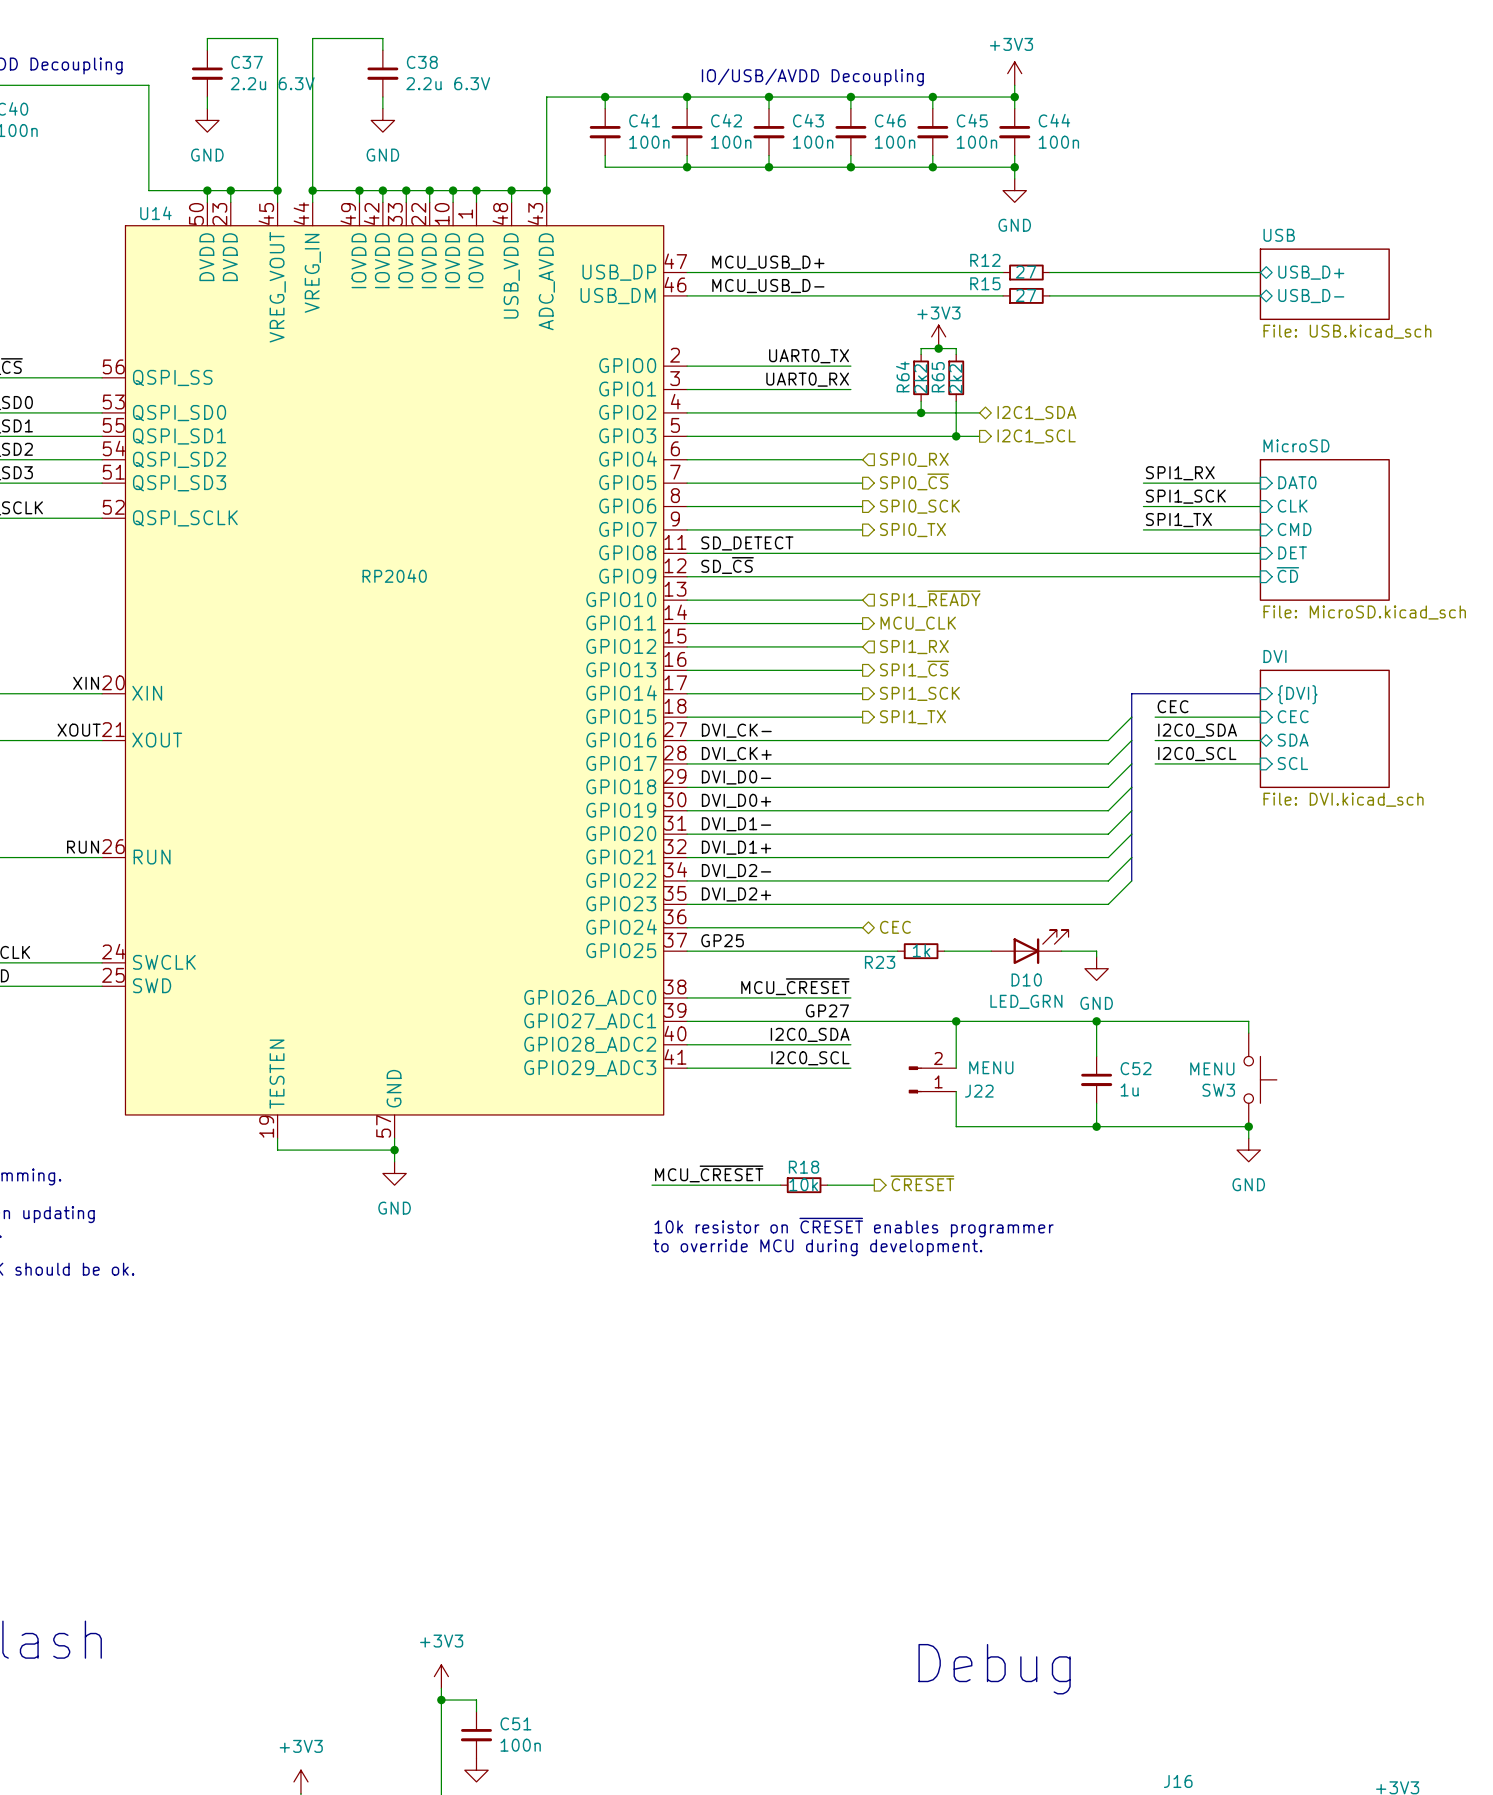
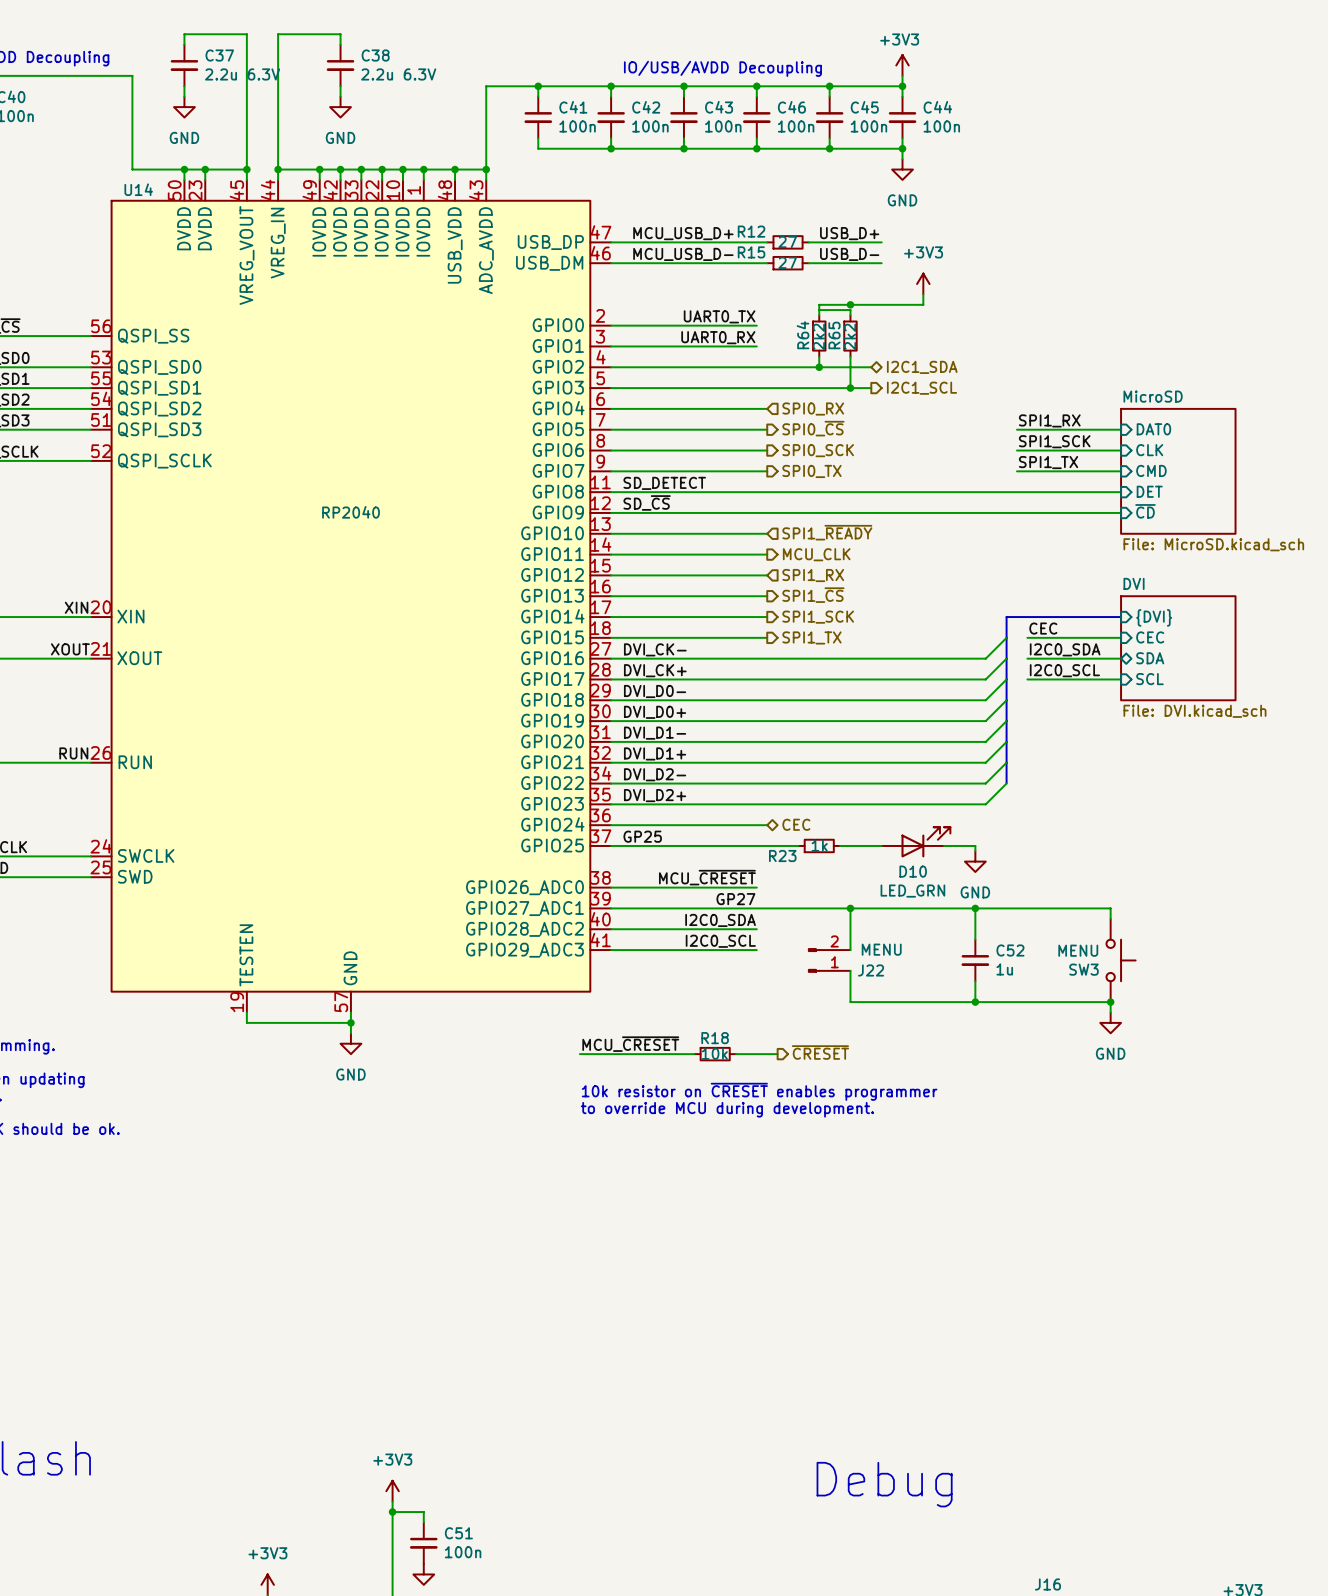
label: none -> USB_D+ (849, 233)
wire: (862, 272) (909, 272) -> none
wire: (991, 272) (1003, 272) -> none
R12 position: (1026, 272) -> (788, 242)
wire: (1049, 272) (1260, 272) -> none
sheet pin: USB_D+ (1311, 272) -> none
sheet USB: File: USB.kicad_sch (1324, 284) -> none
label: none -> USB_D- (849, 254)
wire: (862, 295) (909, 295) -> none
wire: (991, 295) (1003, 295) -> none
R15 position: (1026, 295) -> (788, 263)
wire: (1049, 295) (1260, 295) -> none
sheet pin: USB_D- (1311, 296) -> none
power symbol text position: +3V3 (938, 313) -> +3V3 (923, 252)
wire: none -> (923, 294) (923, 304) (819, 304) (819, 310)
power symbol position: +3V3 (938, 336) -> +3V3 (923, 284)
junction position: (938, 348) -> (850, 304)

